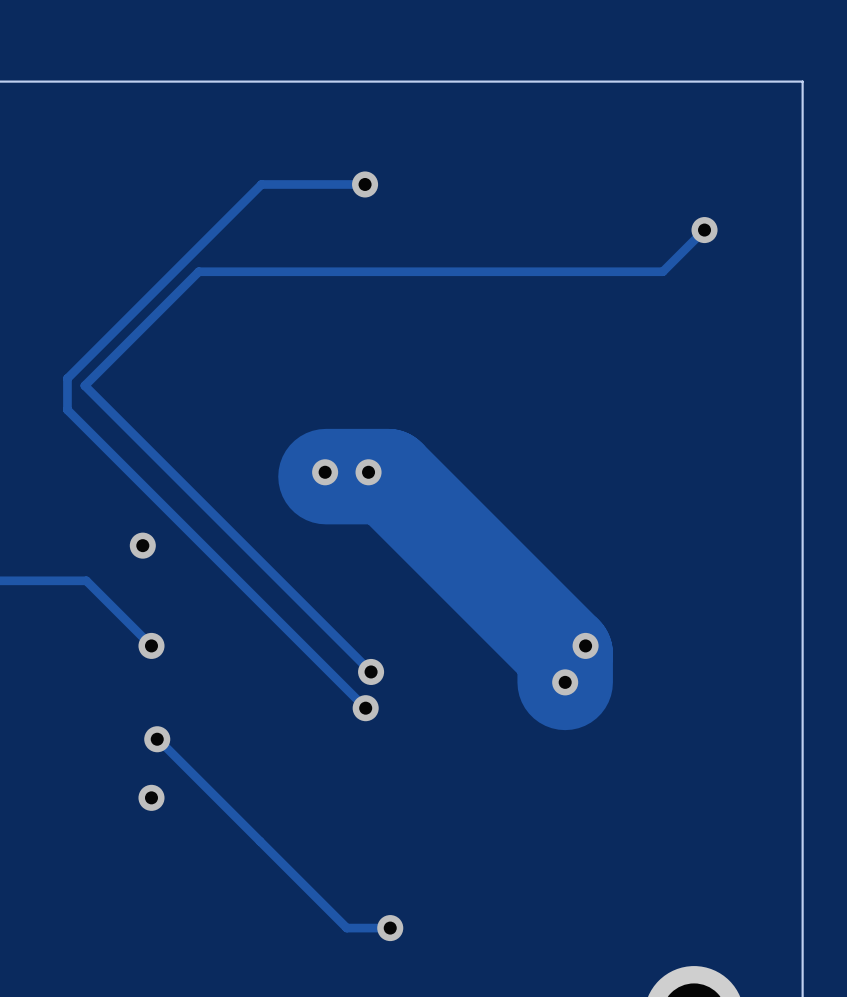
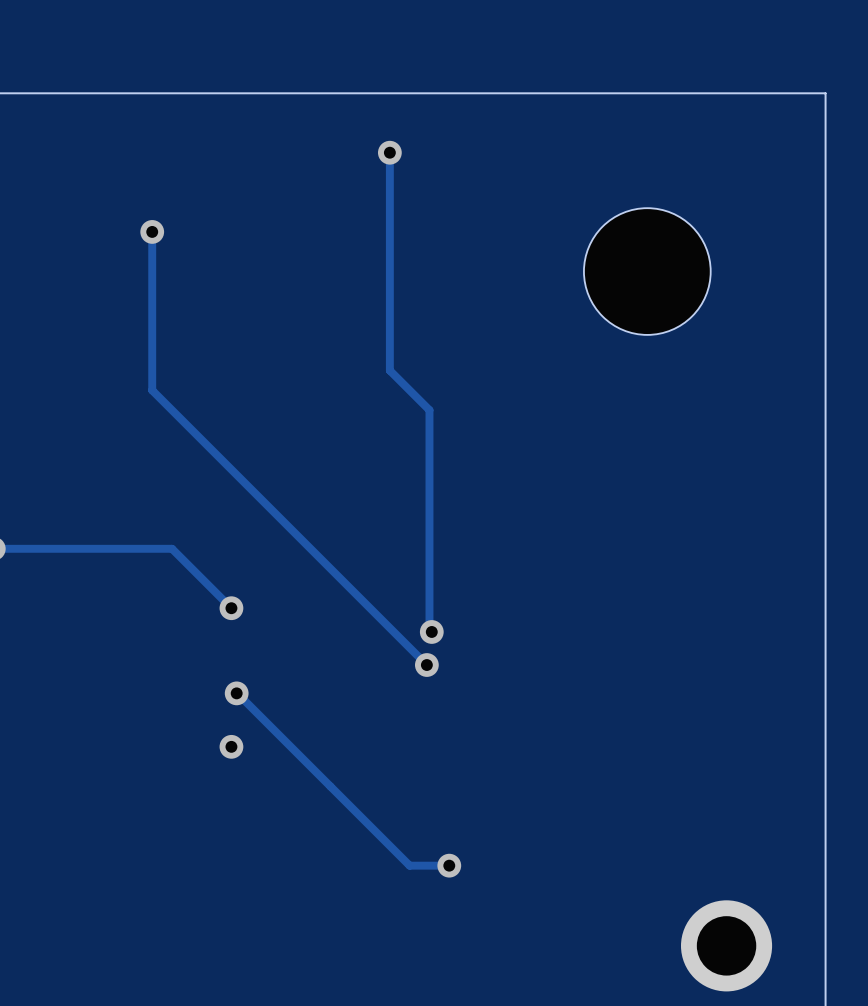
track: (365, 184) (261, 184) (67, 378) (67, 409) -> (152, 231) (152, 390) (154, 392)
via position: (365, 184) -> (389, 152)
track: (704, 230) (662, 271) (198, 271) (84, 385) (368, 669) -> (389, 152) (389, 370) (429, 410) (429, 629)
via: (704, 230) -> none
via: none -> (152, 231)
part: none -> (647, 271)
via: (325, 472) -> none
via: (368, 472) -> none
track: (325, 476) (388, 476) (565, 653) (565, 682) -> none
via: (142, 545) -> none
via: (585, 645) -> none
via: (565, 682) -> none

